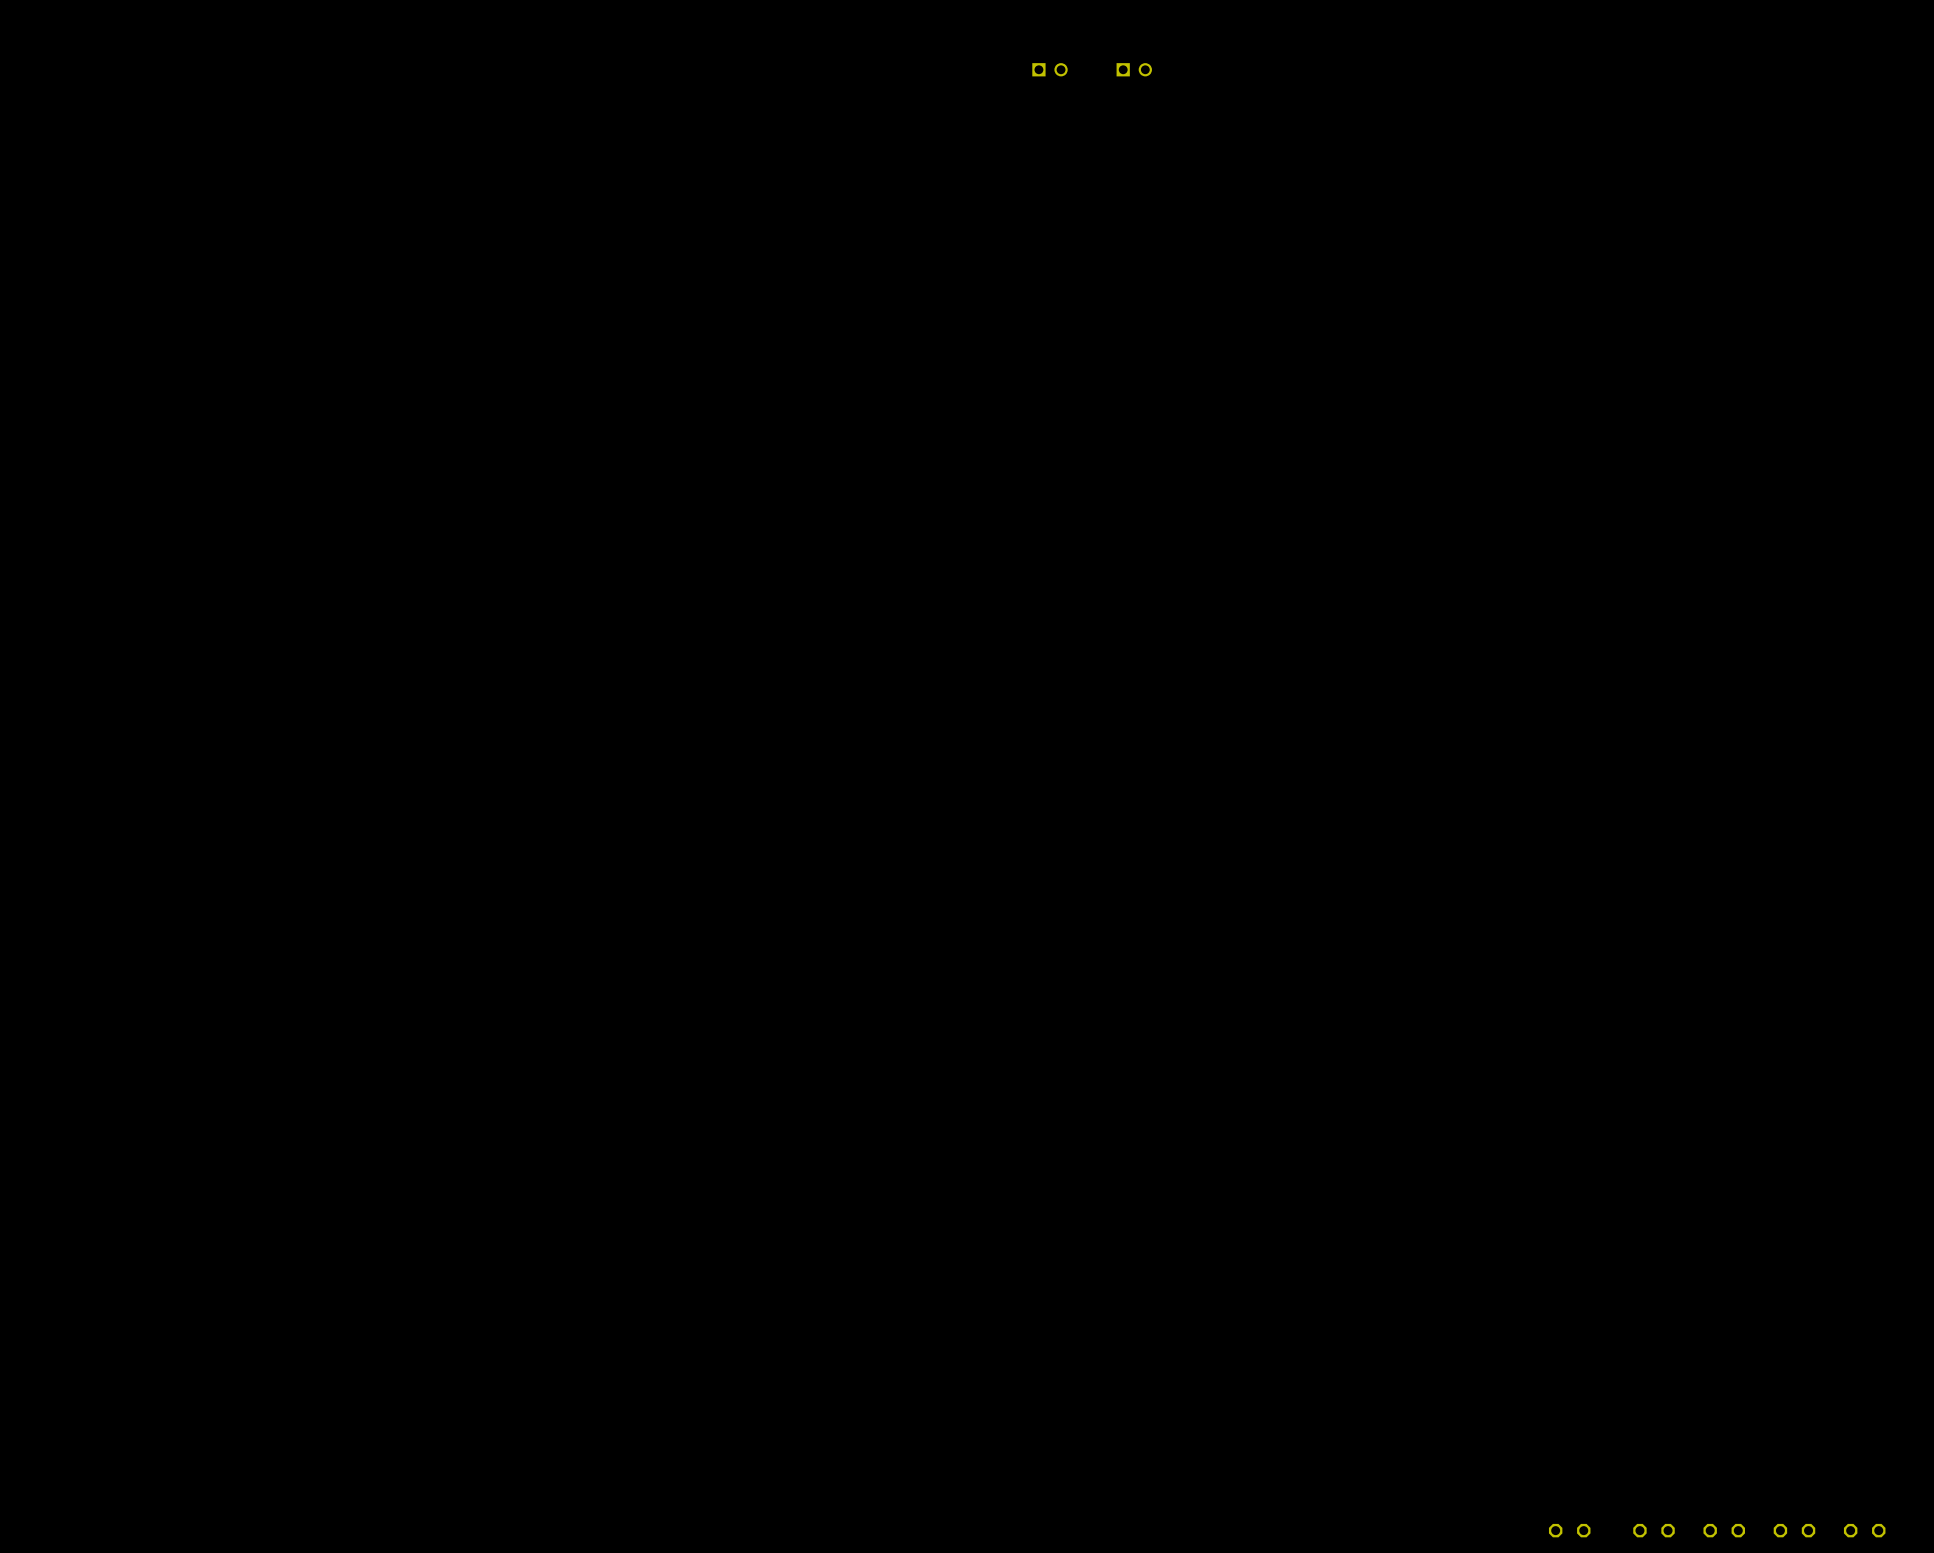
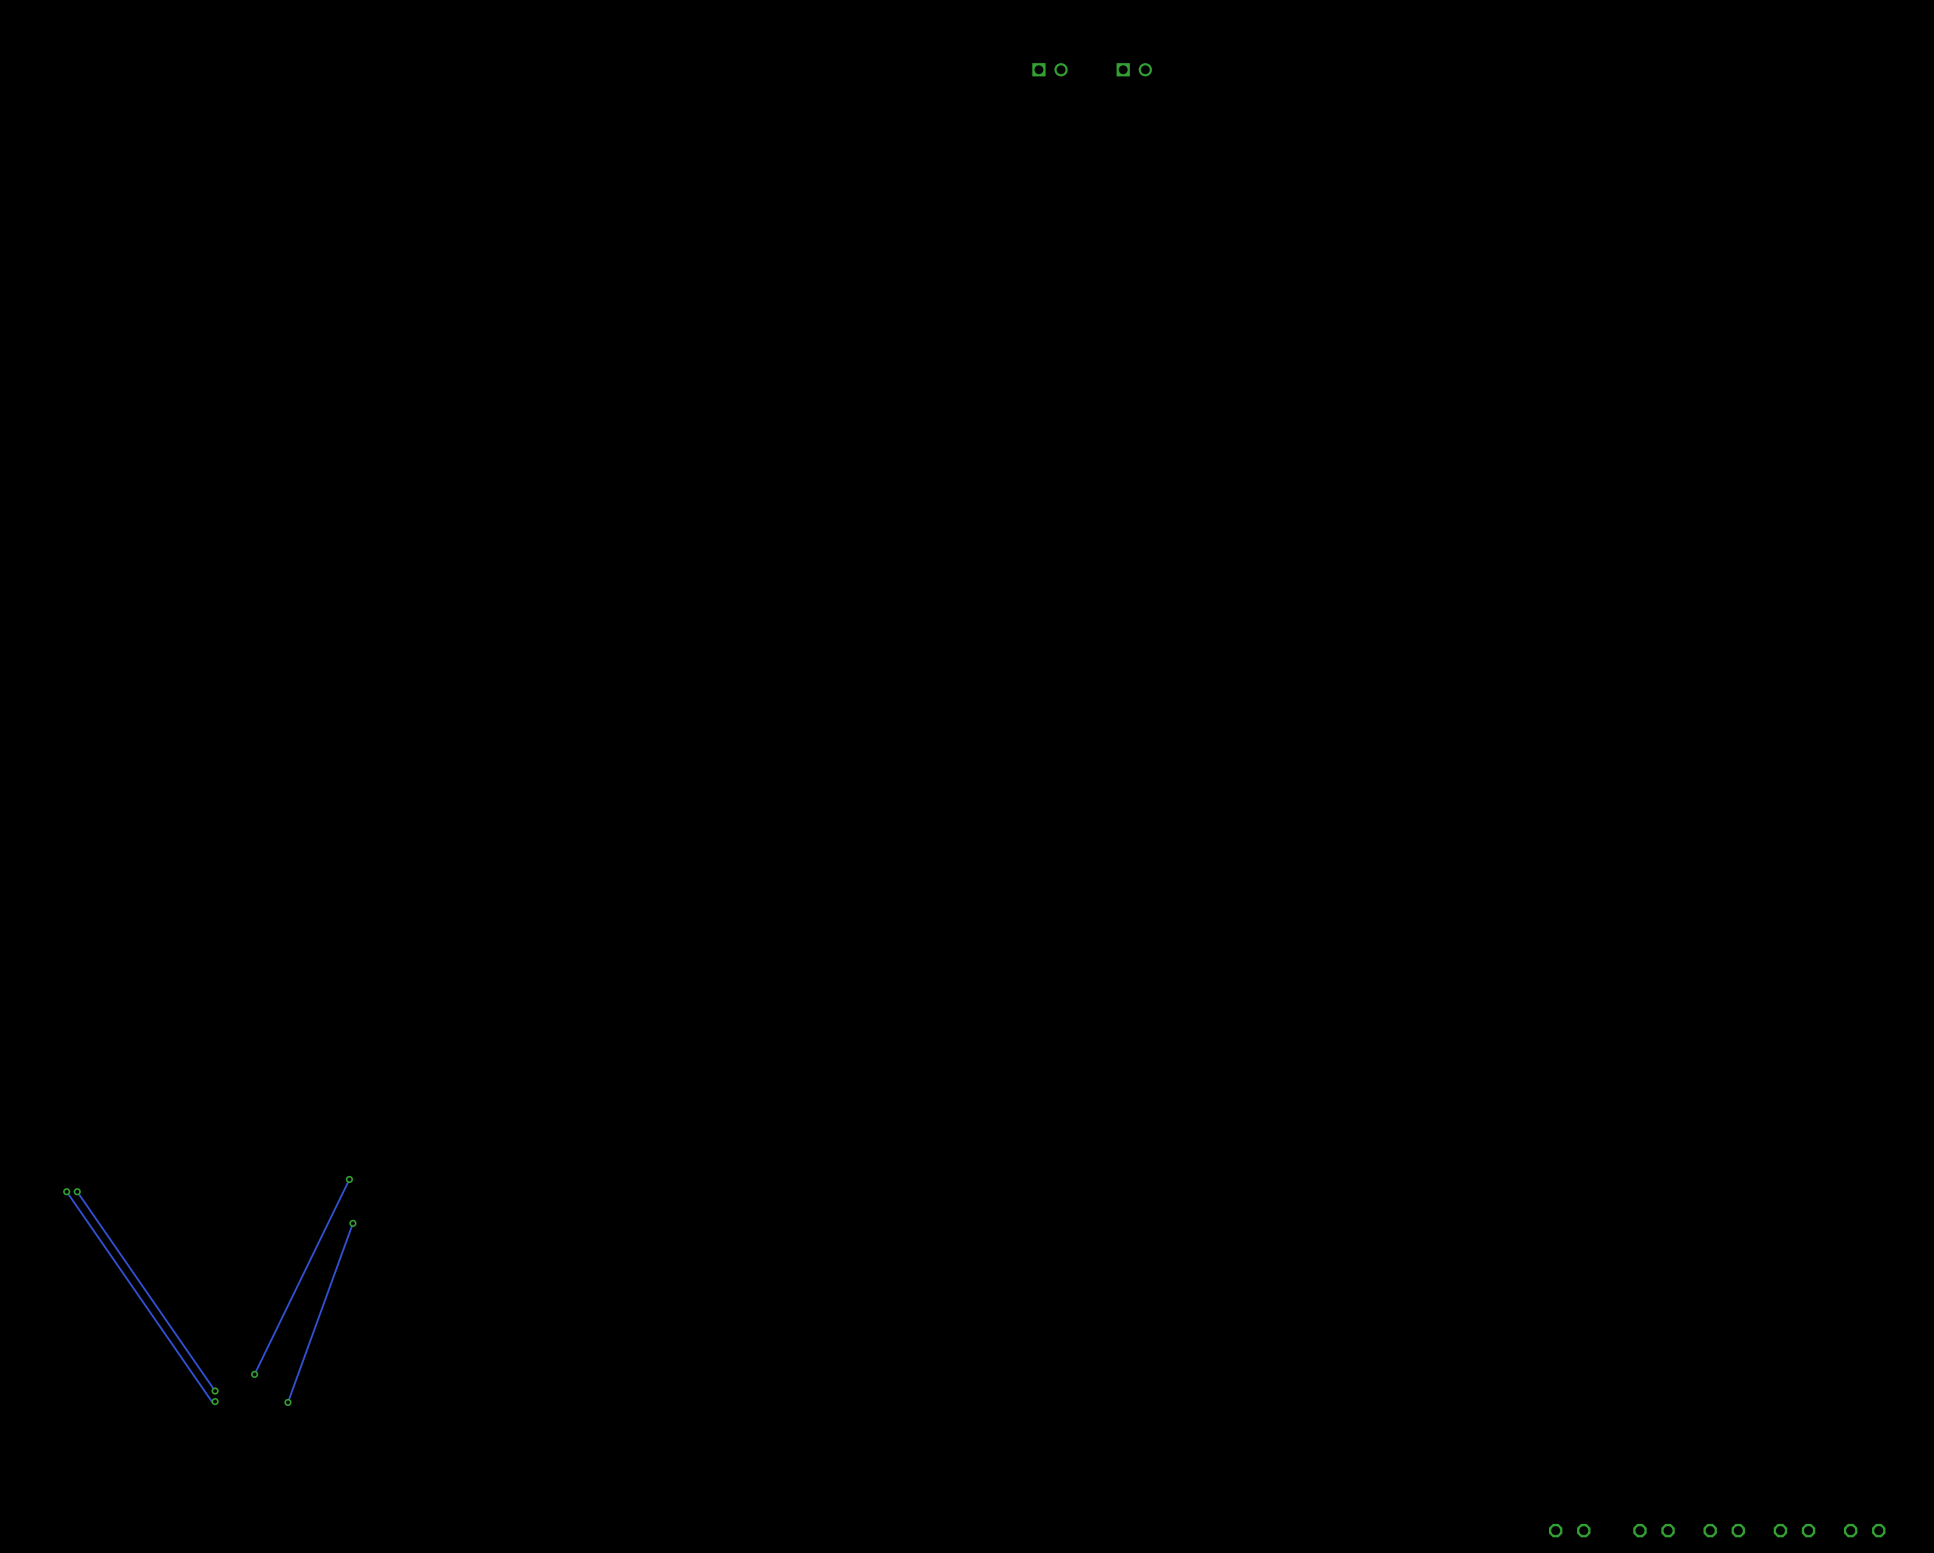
track: none -> (349, 1179) (254, 1374)
via: none -> (349, 1179)
track: none -> (66, 1191) (212, 1402)
via: none -> (66, 1191)
track: none -> (77, 1191) (215, 1391)
via: none -> (77, 1191)
track: none -> (352, 1223) (287, 1402)
via: none -> (352, 1223)
via: none -> (254, 1374)
via: none -> (215, 1391)
via: none -> (215, 1401)
via: none -> (287, 1402)

